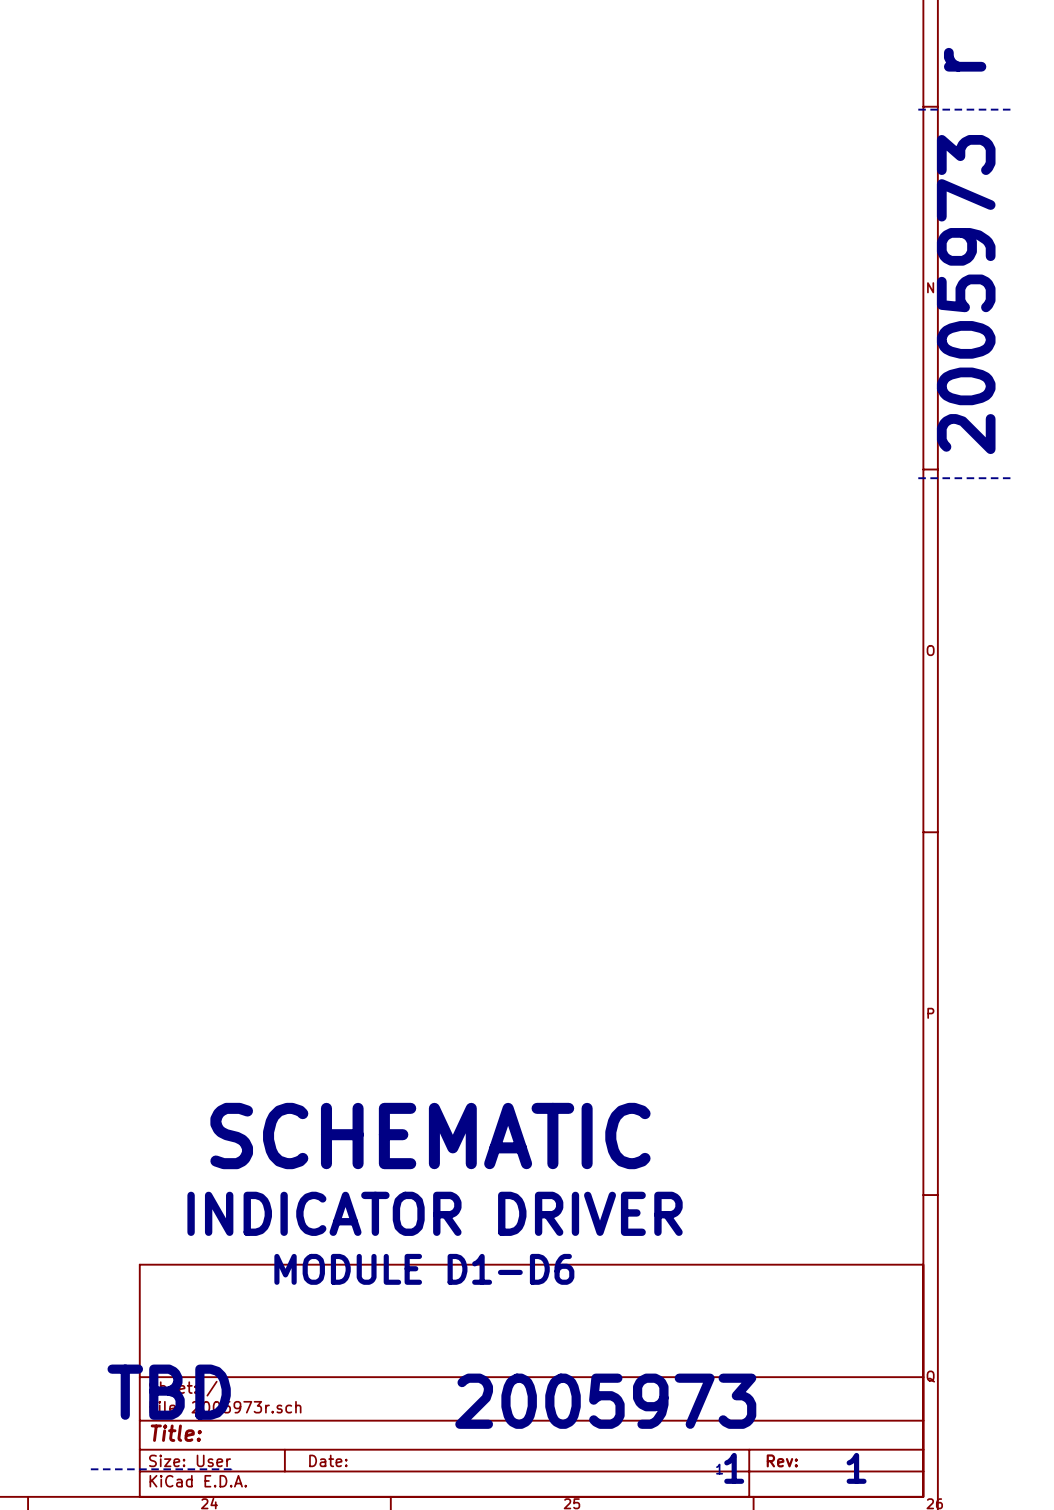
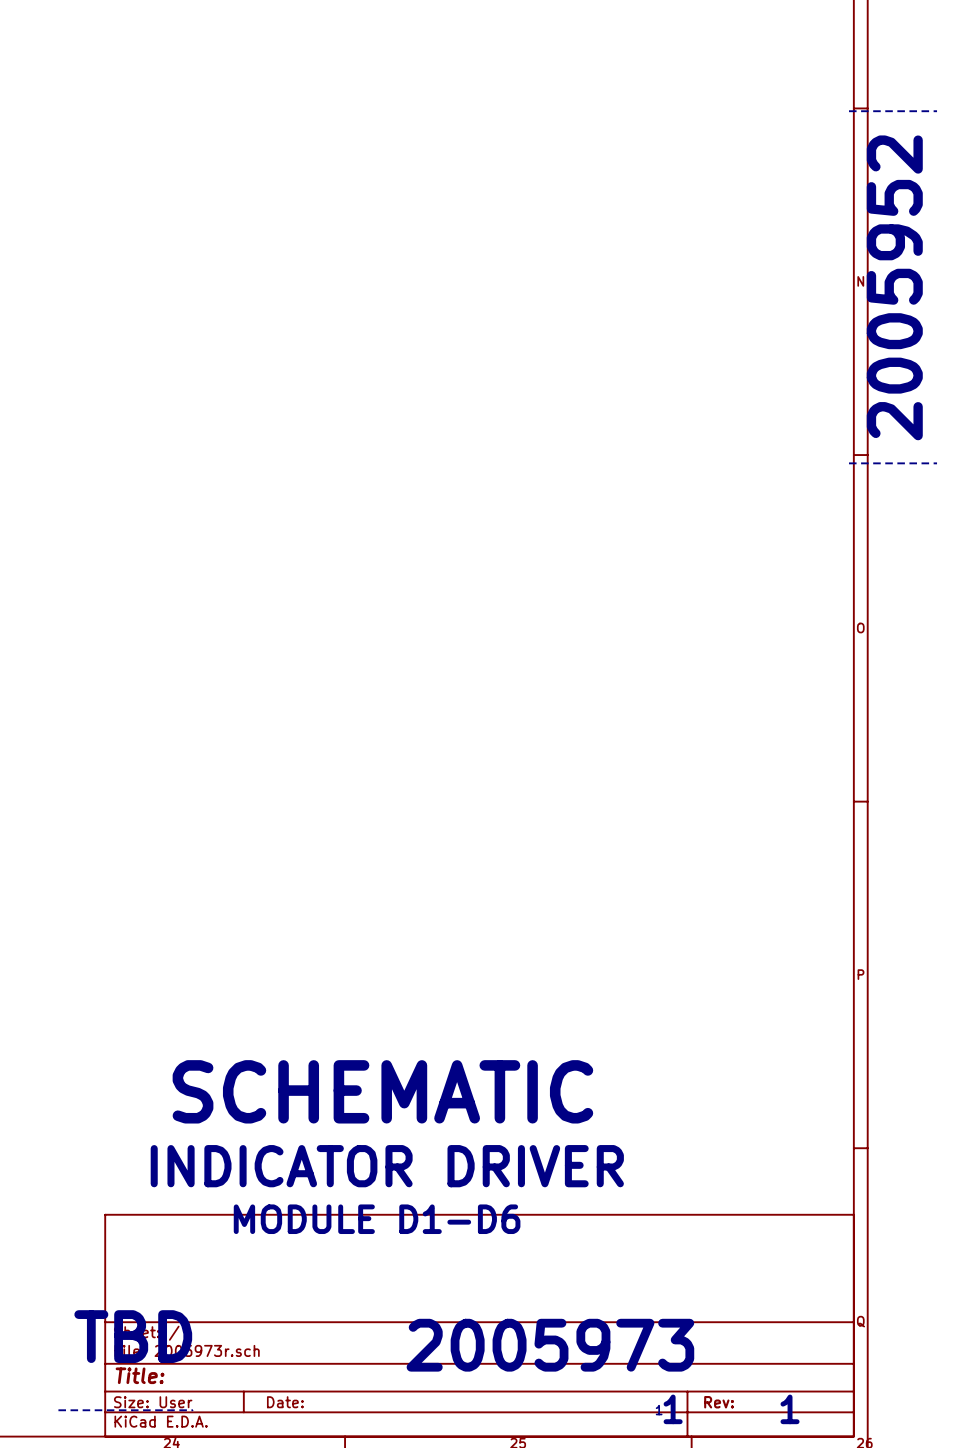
text: r (965, 59) -> none
text: 2005973 (966, 294) -> 2005952 (894, 287)

